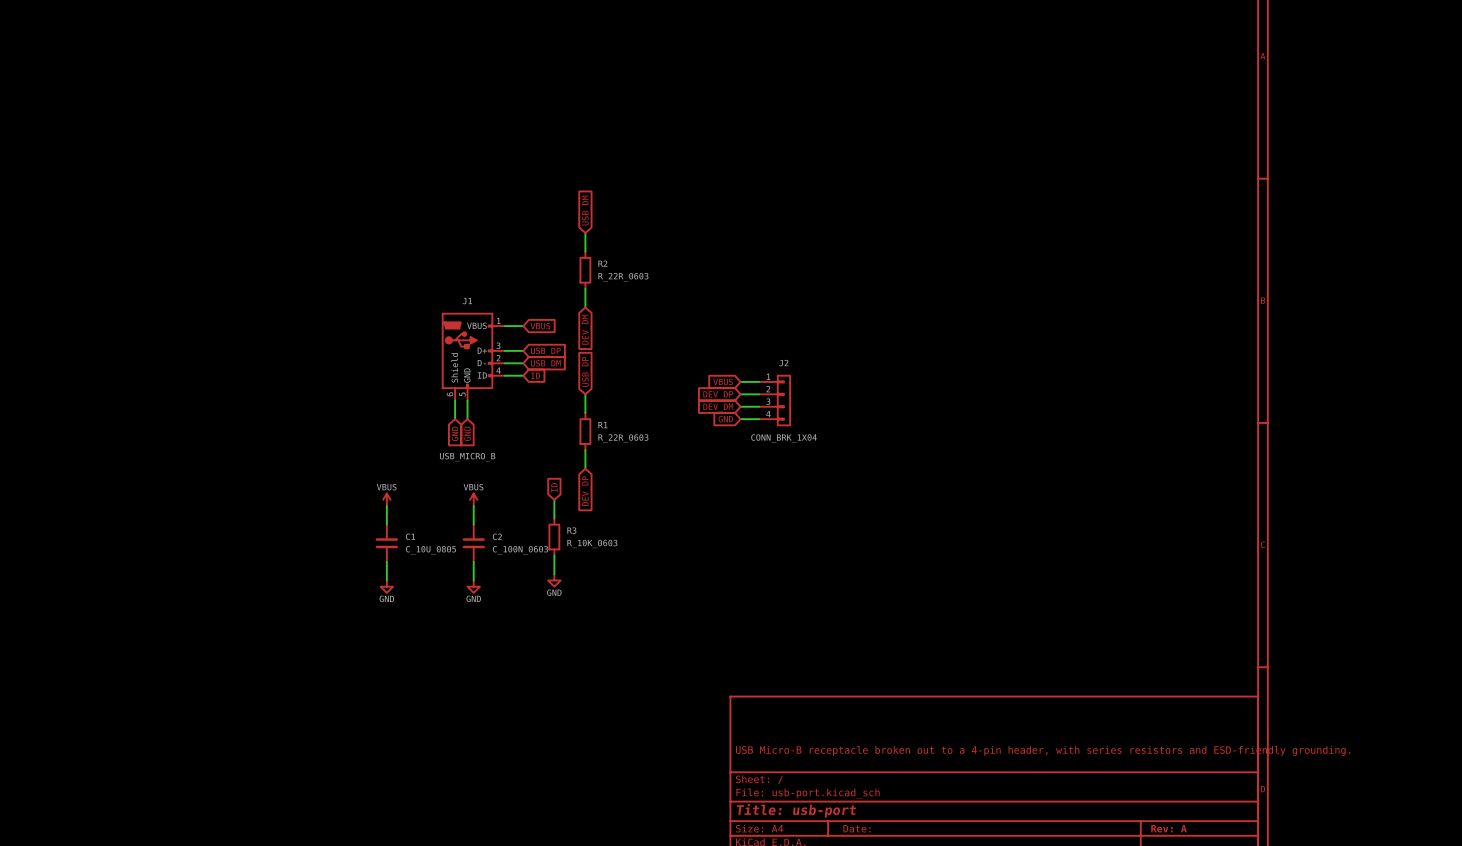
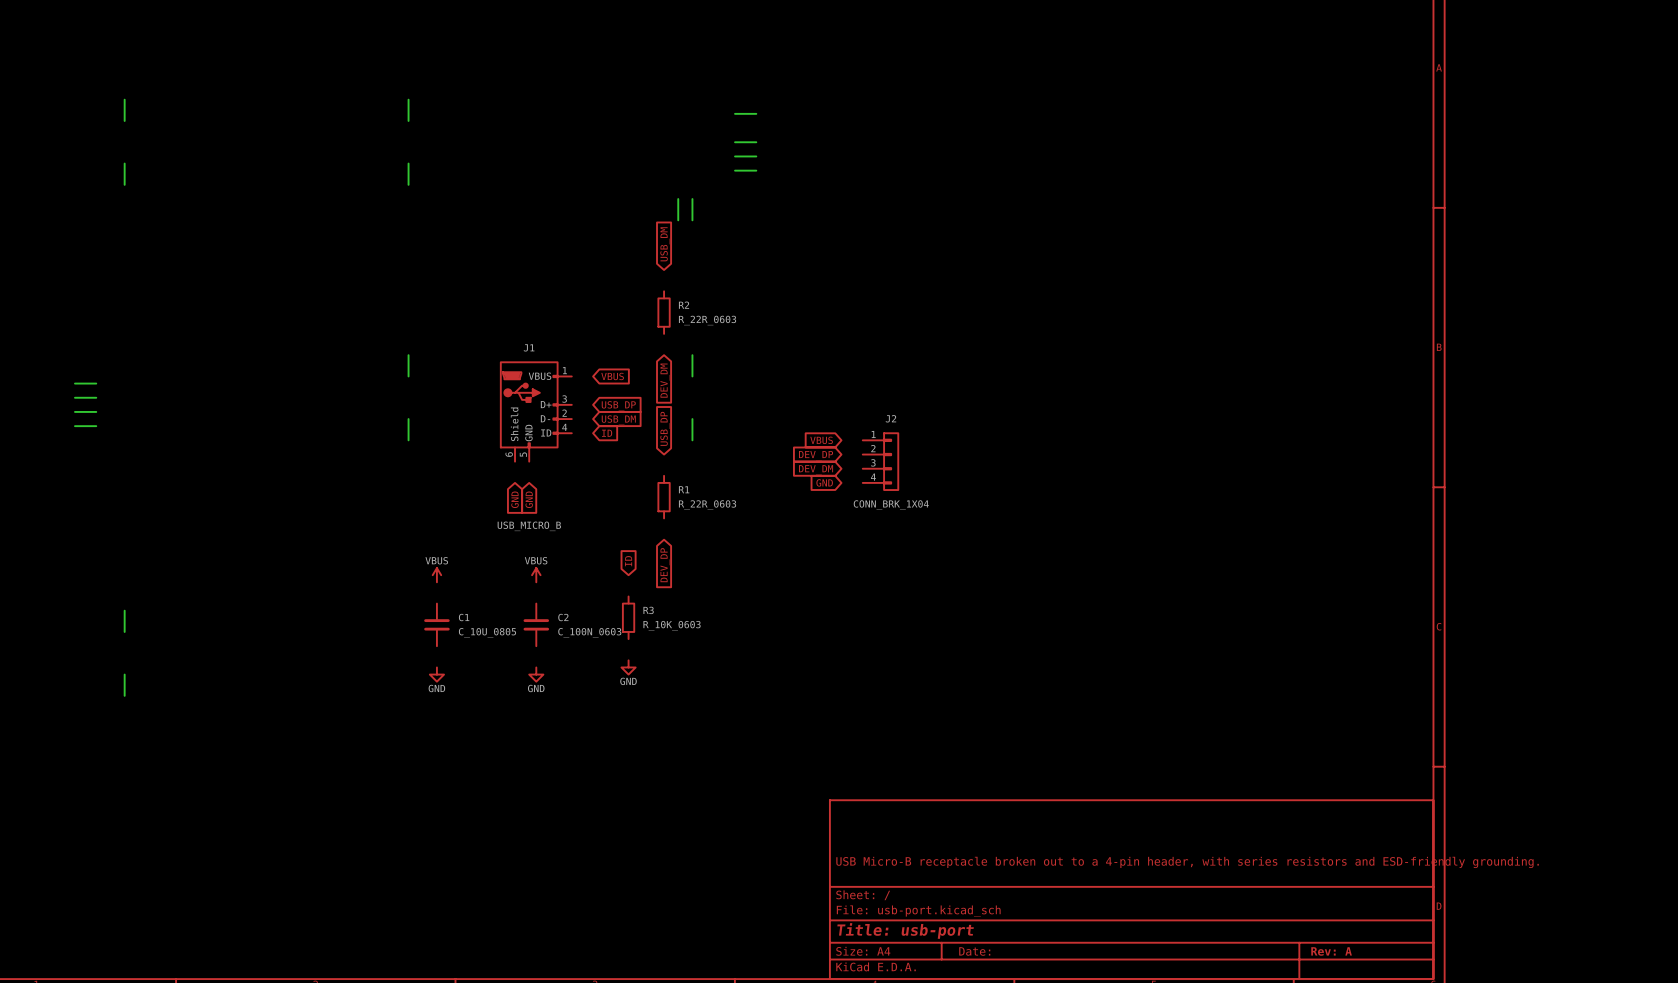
wire: none -> (124, 99) (124, 120)
wire: none -> (408, 99) (408, 120)
wire: none -> (735, 113) (756, 113)
wire: none -> (735, 142) (756, 142)
wire: none -> (735, 156) (756, 156)
wire: none -> (124, 163) (124, 184)
wire: none -> (408, 163) (408, 184)
wire: none -> (735, 170) (756, 170)
wire: none -> (678, 199) (678, 220)
wire: none -> (692, 199) (692, 220)
wire: (585, 233) (585, 251) -> (692, 355) (692, 376)
wire: (585, 288) (585, 307) -> (692, 419) (692, 440)
wire: none -> (408, 355) (408, 376)
wire: (504, 326) (523, 326) -> none
wire: none -> (74, 383) (96, 383)
wire: none -> (74, 397) (96, 397)
wire: (504, 350) (523, 350) -> none
wire: none -> (74, 411) (96, 411)
wire: (504, 363) (523, 363) -> none
wire: none -> (74, 426) (96, 426)
wire: (504, 375) (523, 375) -> none
wire: (740, 381) (759, 381) -> none
wire: (585, 394) (585, 412) -> none
wire: (740, 394) (759, 394) -> none
wire: (455, 400) (455, 419) -> (408, 419) (408, 440)
wire: (467, 400) (467, 419) -> none
wire: (740, 406) (759, 406) -> none
wire: (740, 419) (759, 419) -> none
wire: (585, 450) (585, 468) -> none
wire: (554, 499) (554, 518) -> none
wire: (386, 506) (386, 524) -> none
wire: (473, 506) (473, 524) -> none
wire: none -> (124, 610) (124, 631)
wire: (554, 555) (554, 574) -> none
wire: (386, 561) (386, 580) -> none
wire: (473, 561) (473, 580) -> none
wire: none -> (124, 674) (124, 695)

